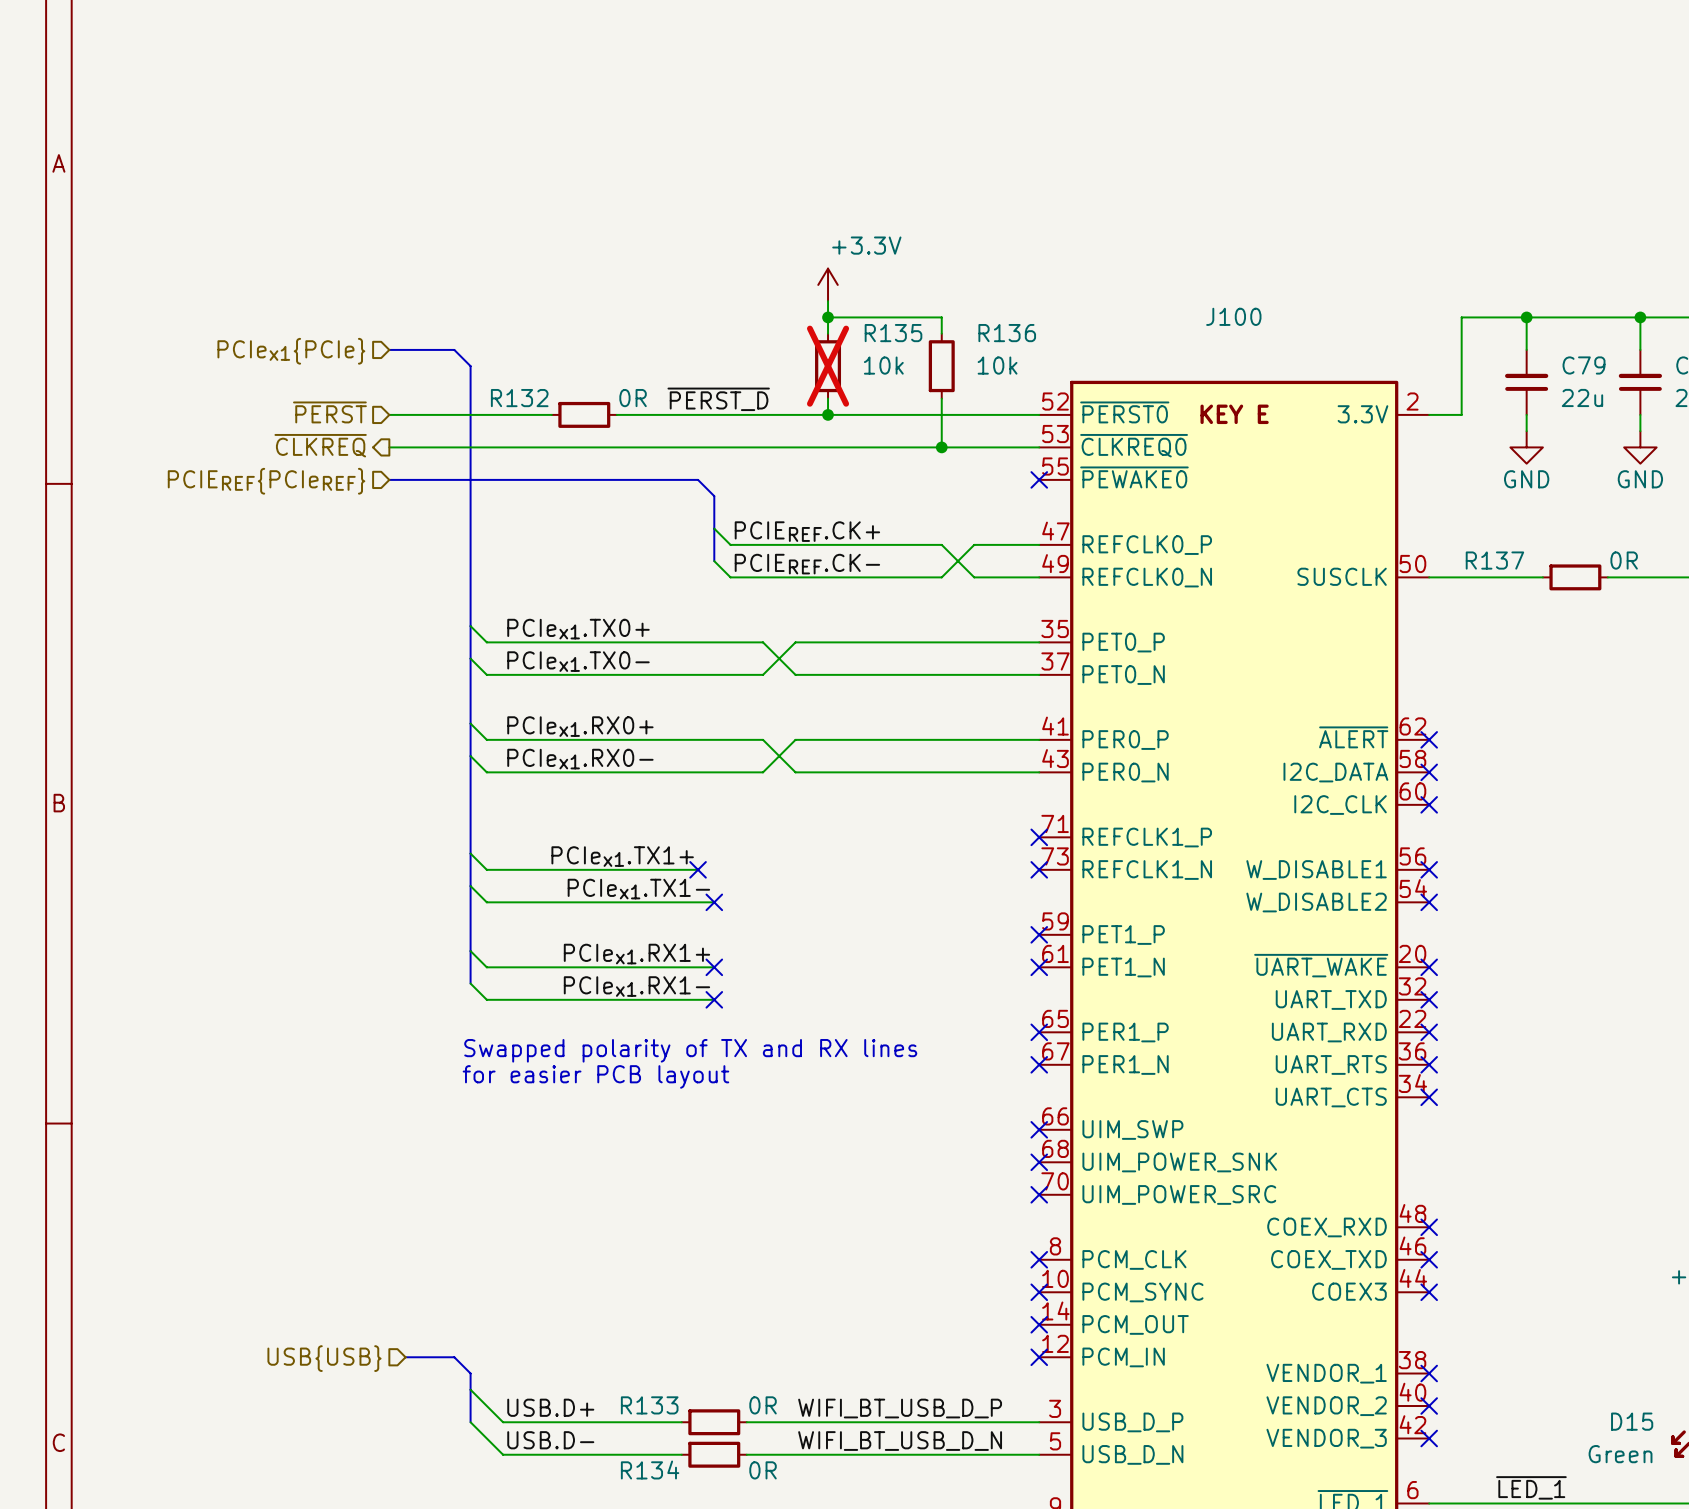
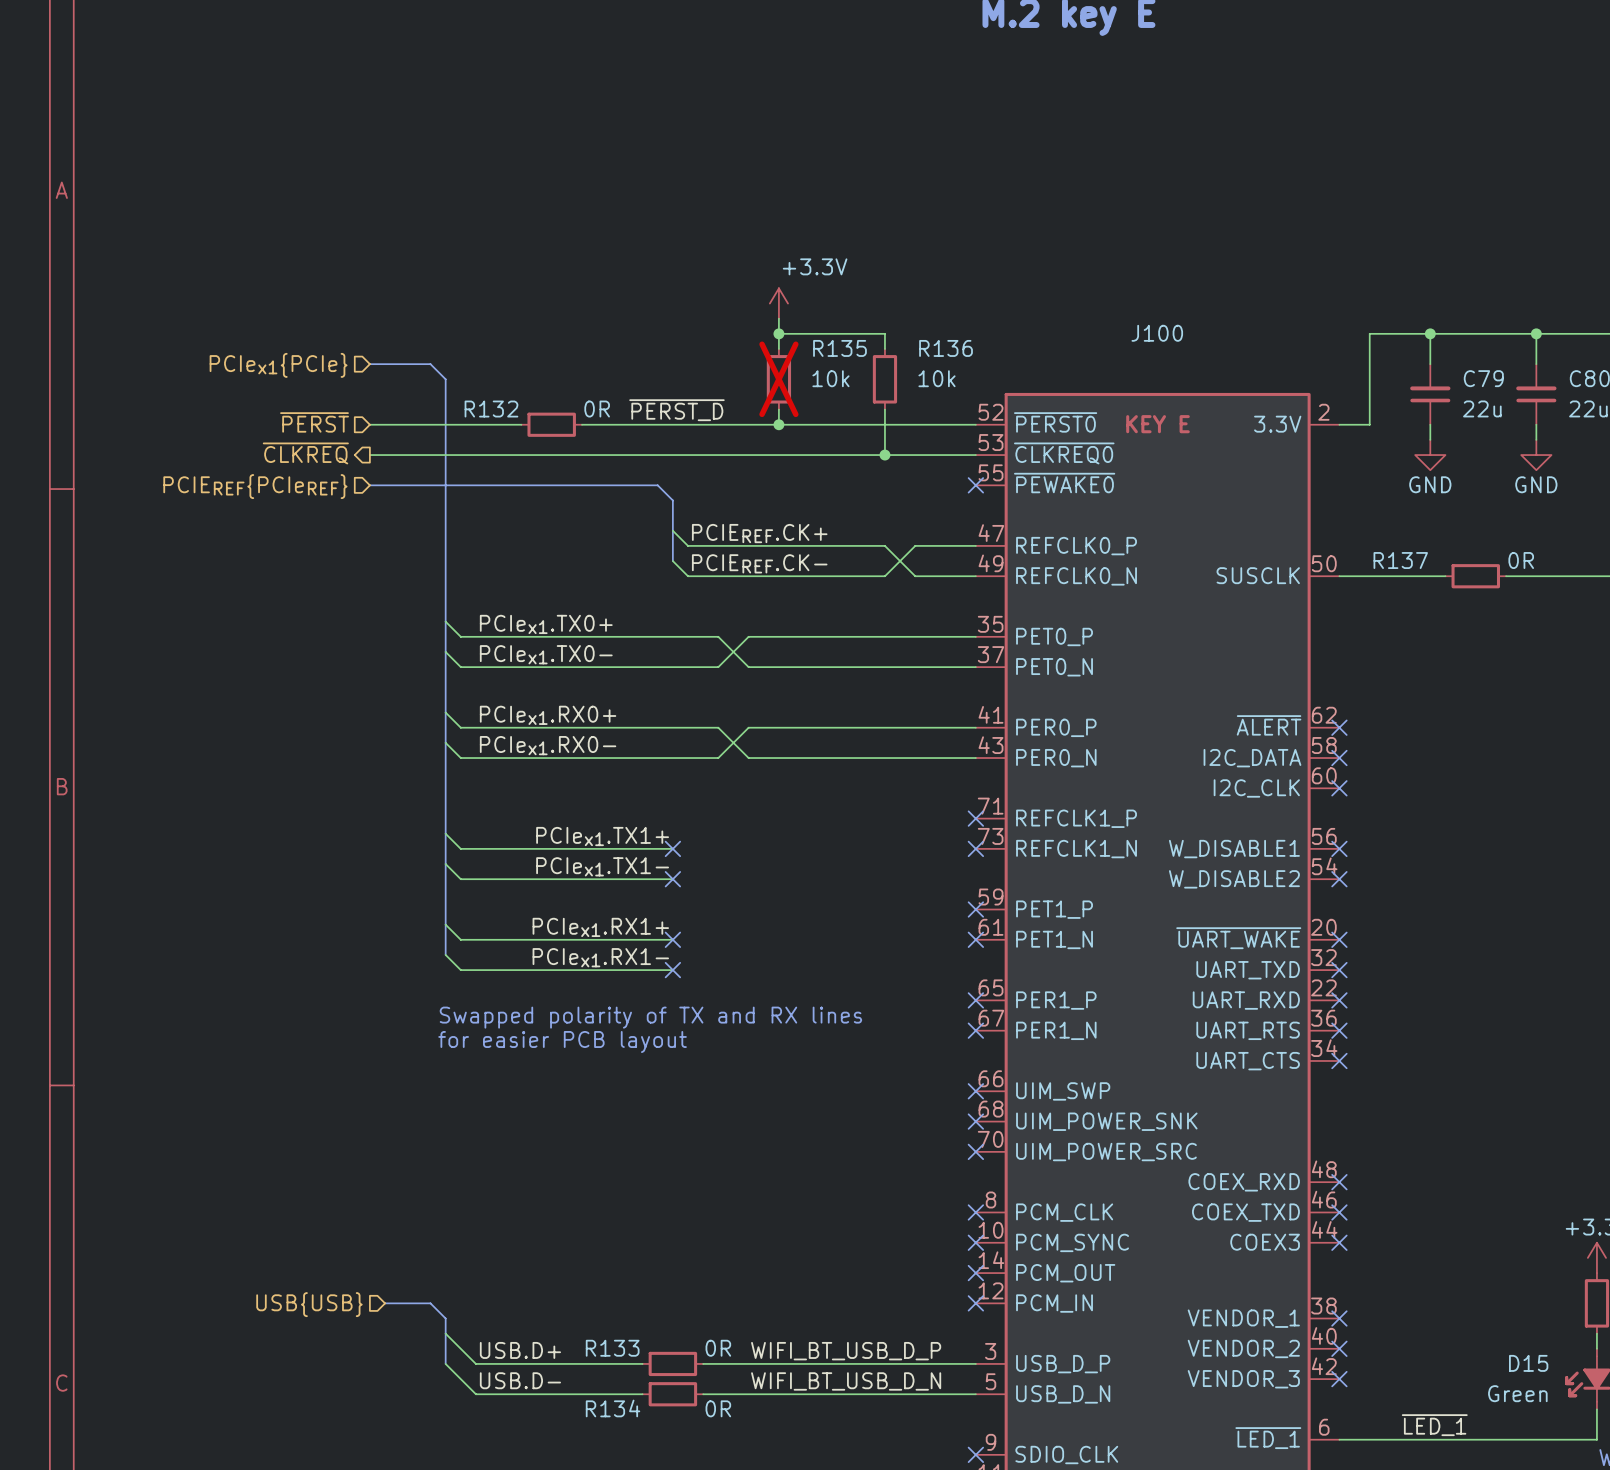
label position: PCIex1.TX1+ (622, 856) -> PCIex1.TX1+ (602, 836)
wire: none -> (657, 848) (672, 848)
no-connect mark position: (698, 869) -> (672, 848)

